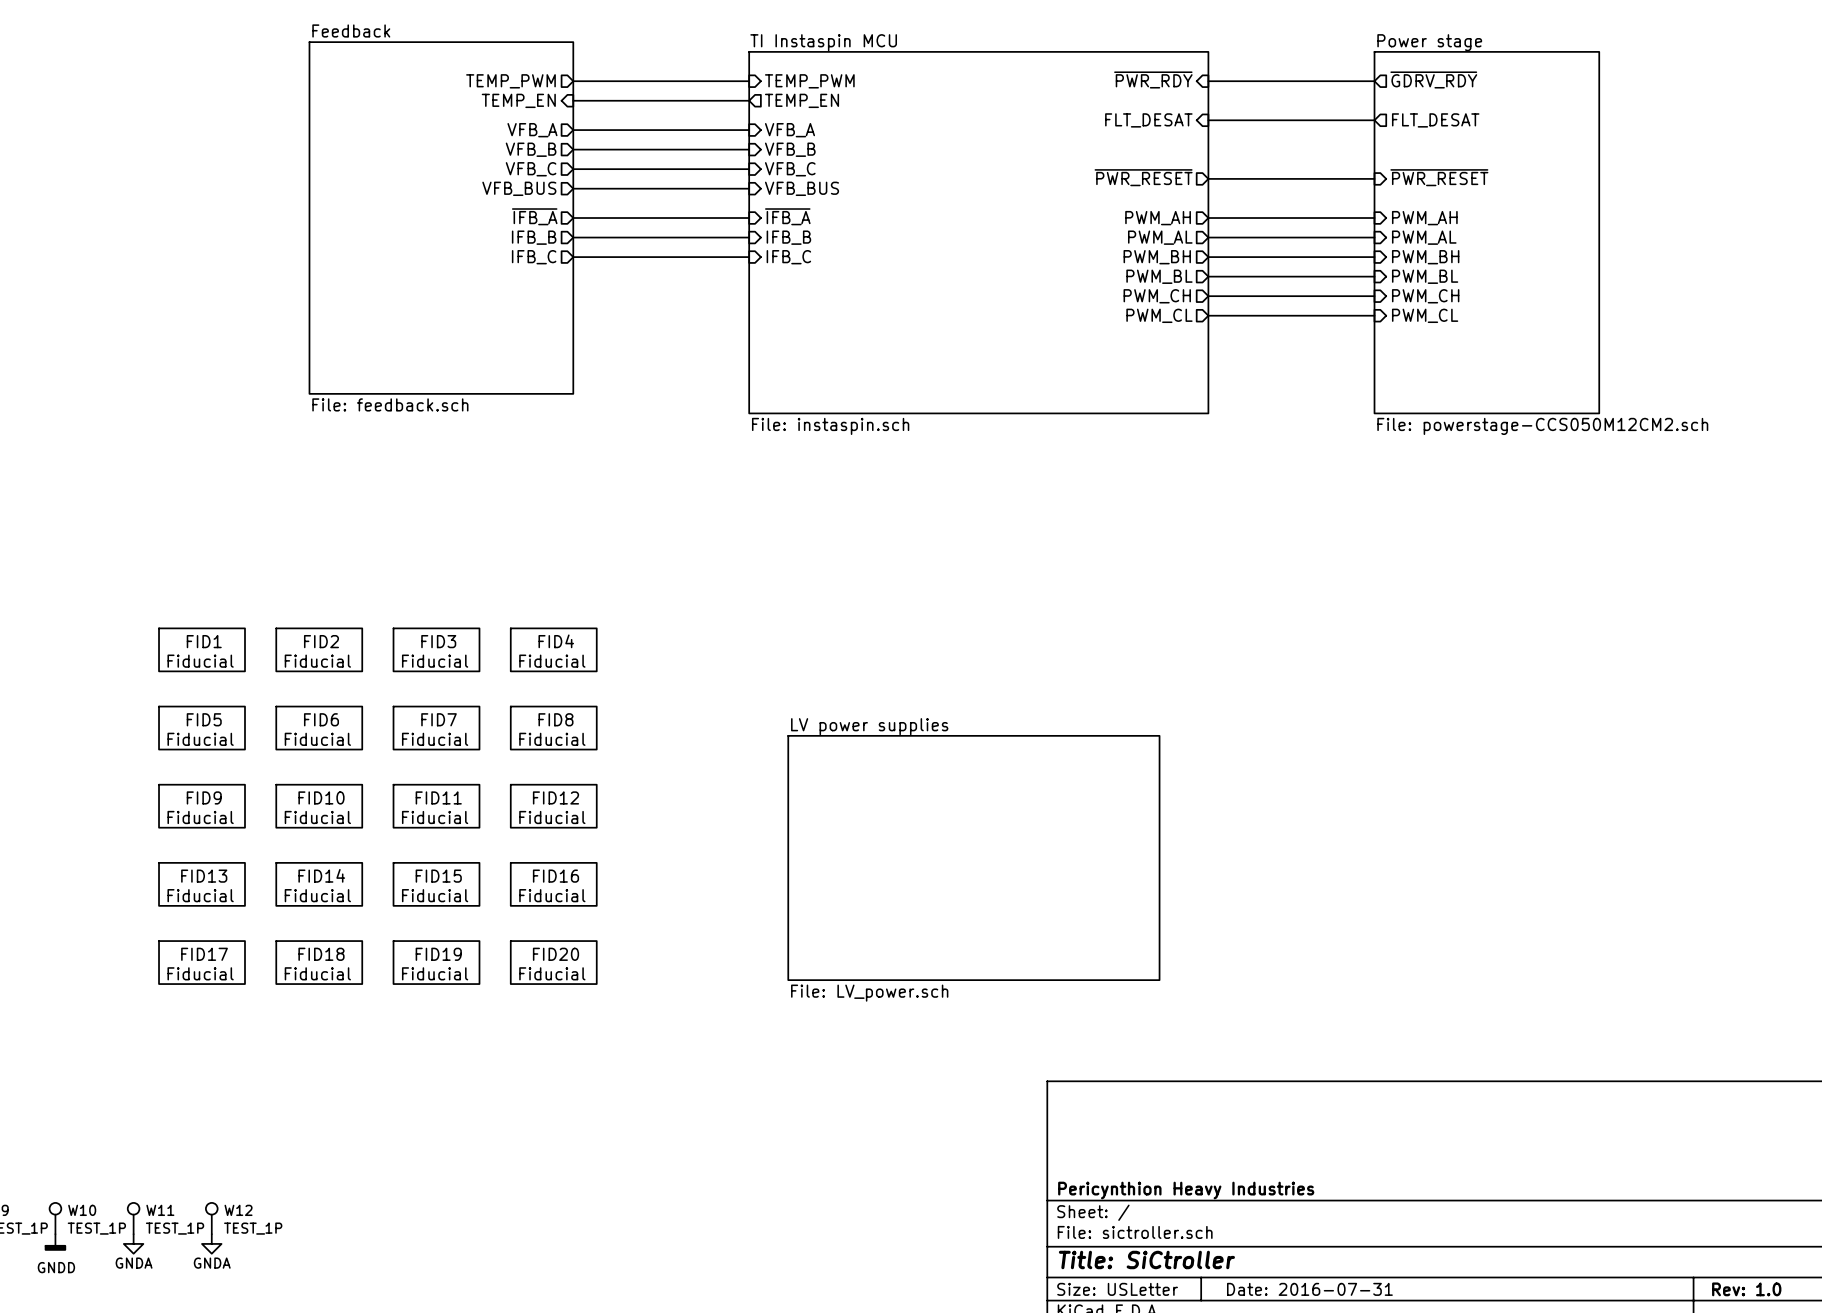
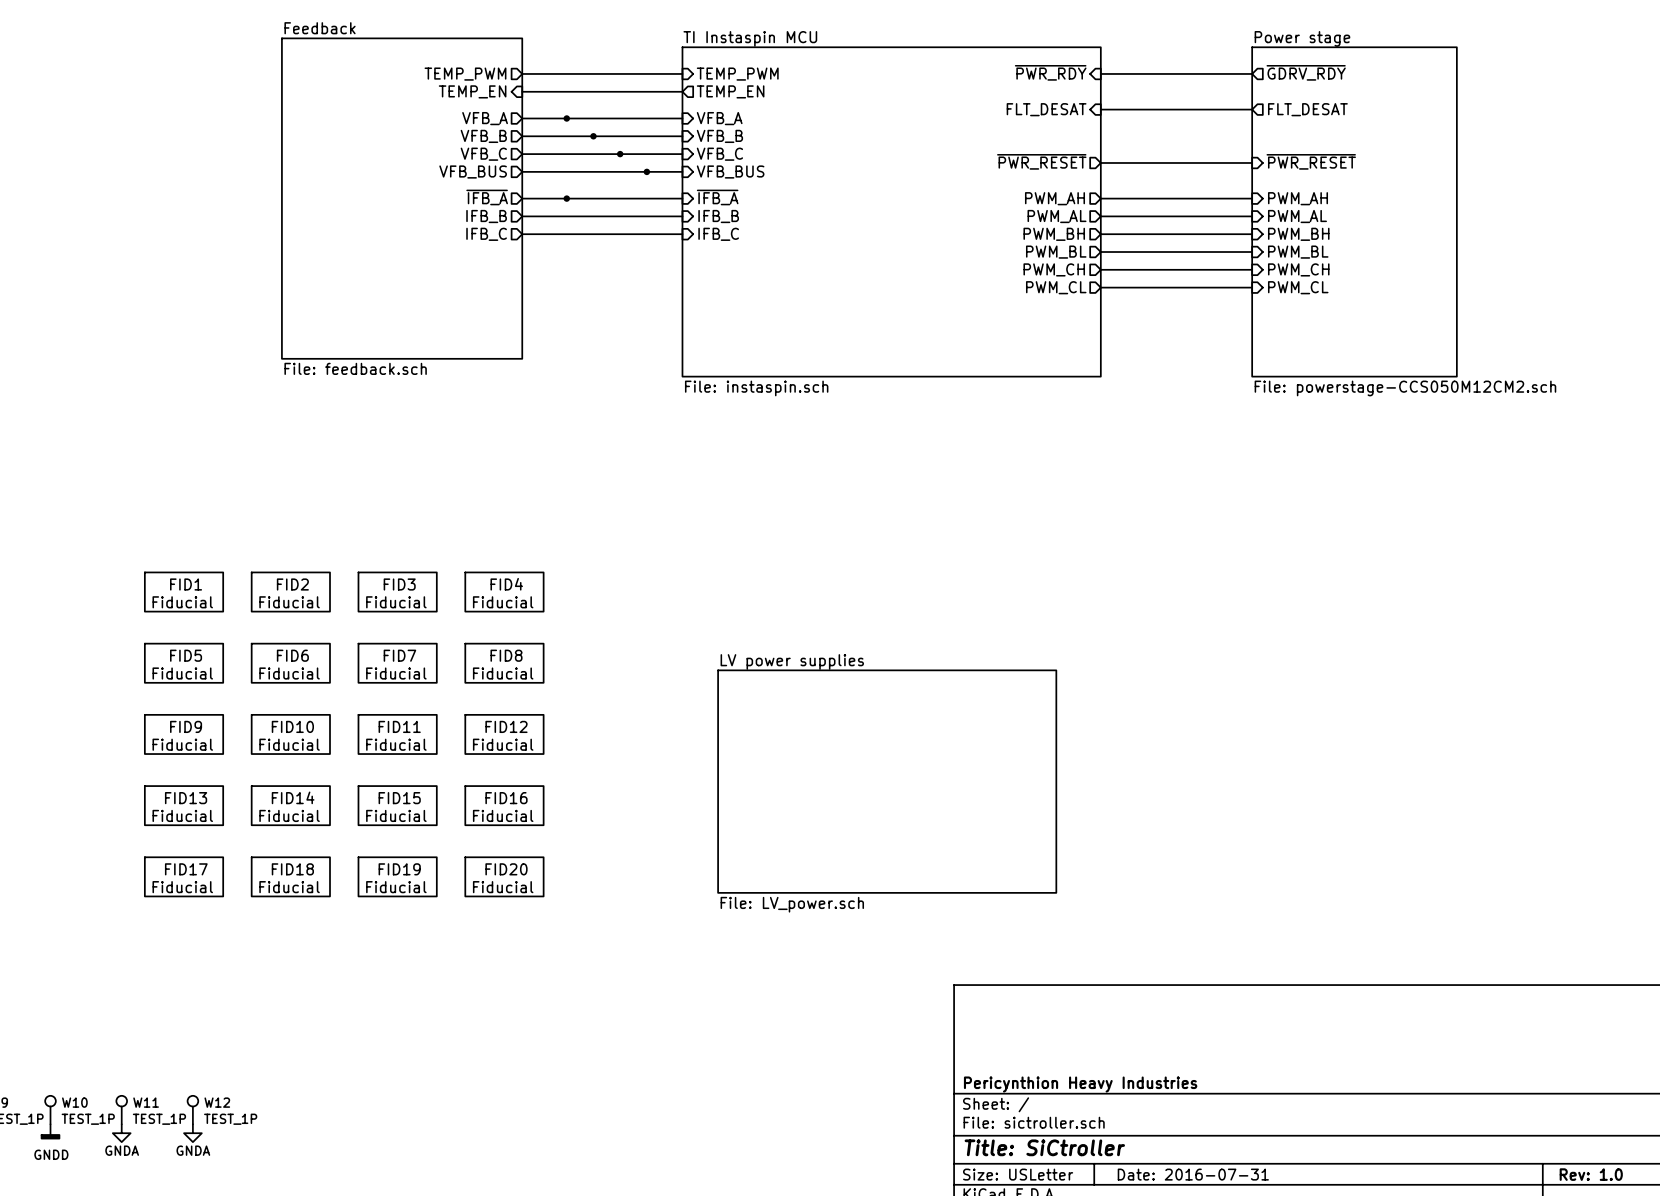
junction: none -> (566, 118)
junction: none -> (593, 136)
junction: none -> (620, 154)
junction: none -> (646, 171)
junction: none -> (566, 198)

